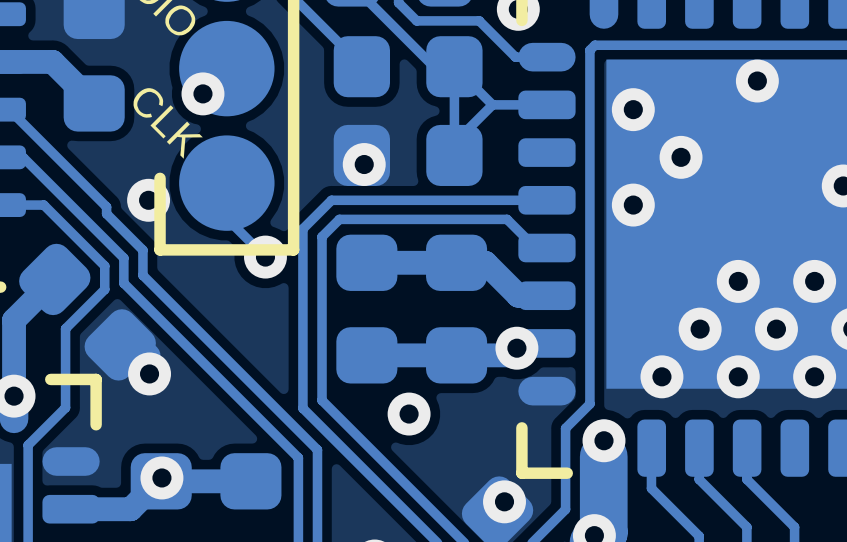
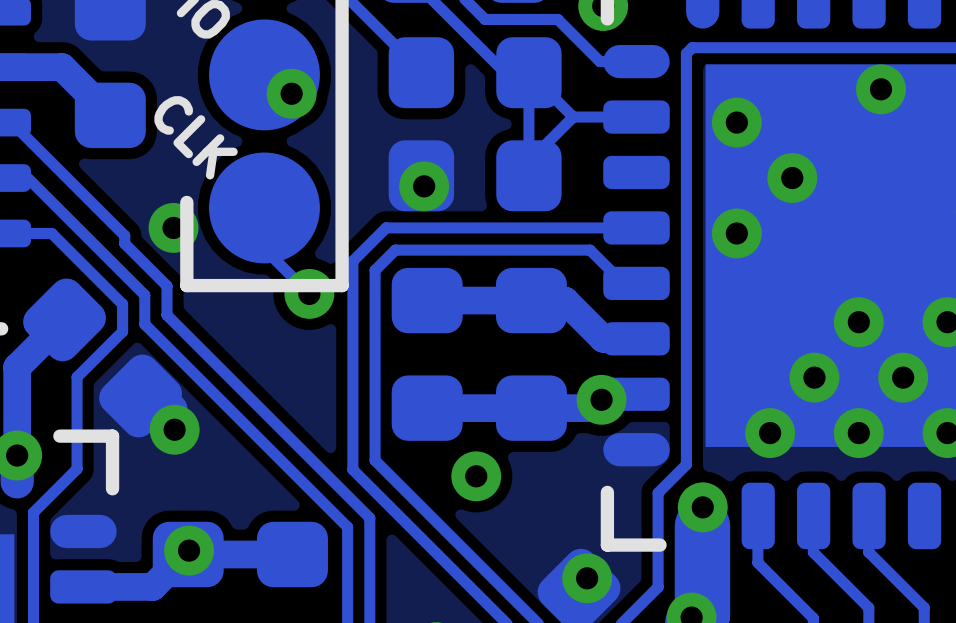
via position: (202, 93) -> (291, 93)

